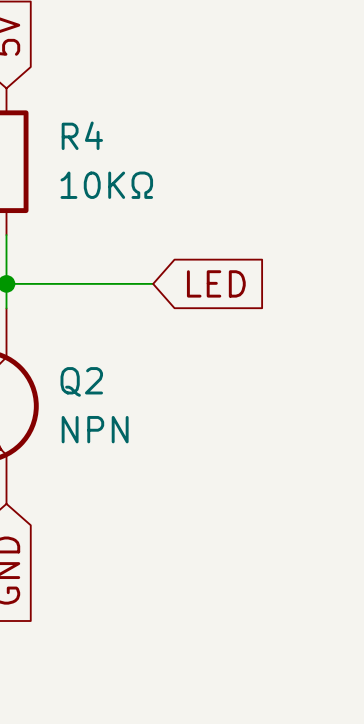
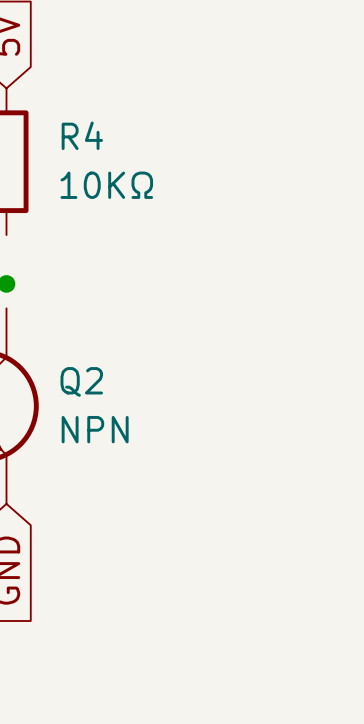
wire: (6, 235) (6, 308) -> none
wire: (6, 283) (153, 283) -> none
global label: LED (216, 283) -> none

